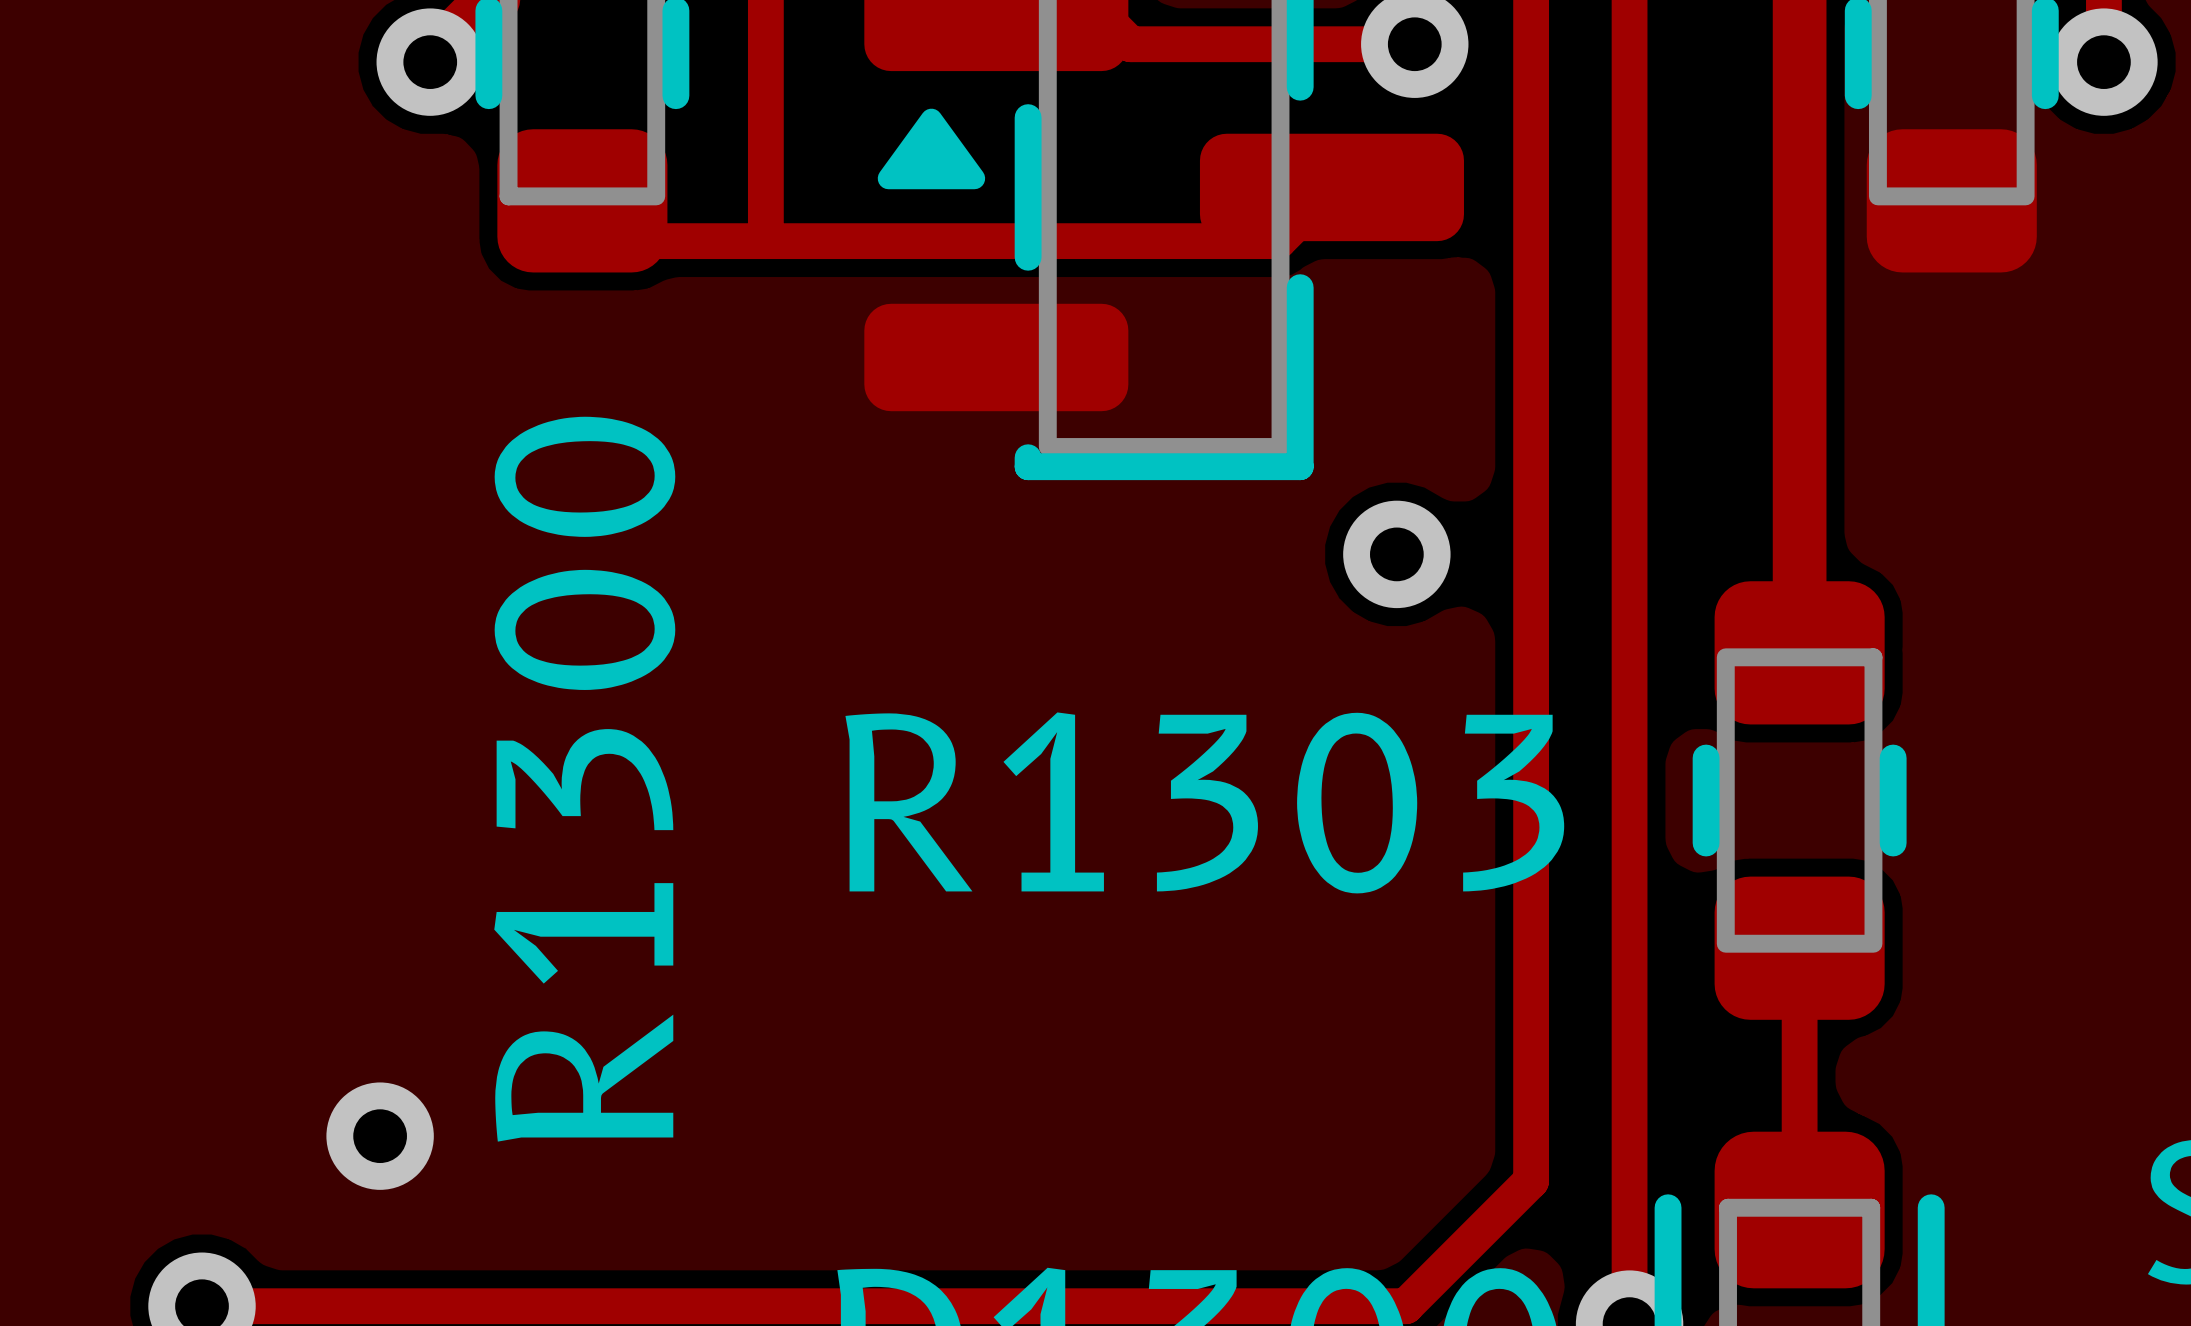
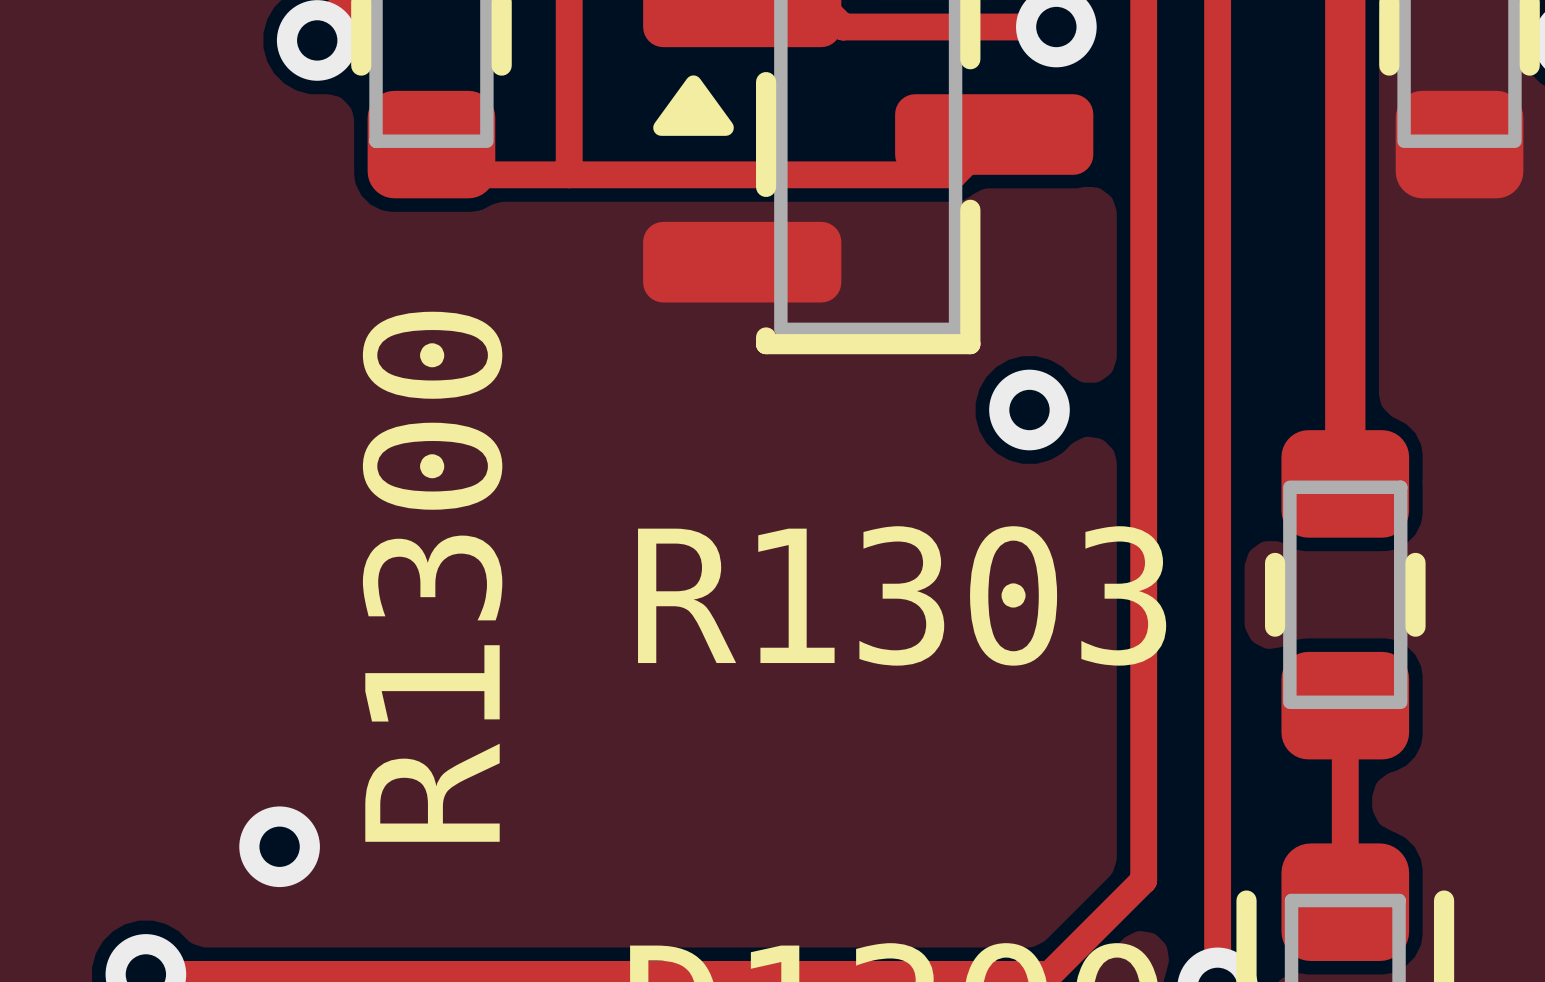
via position: (1396, 554) -> (1029, 410)

